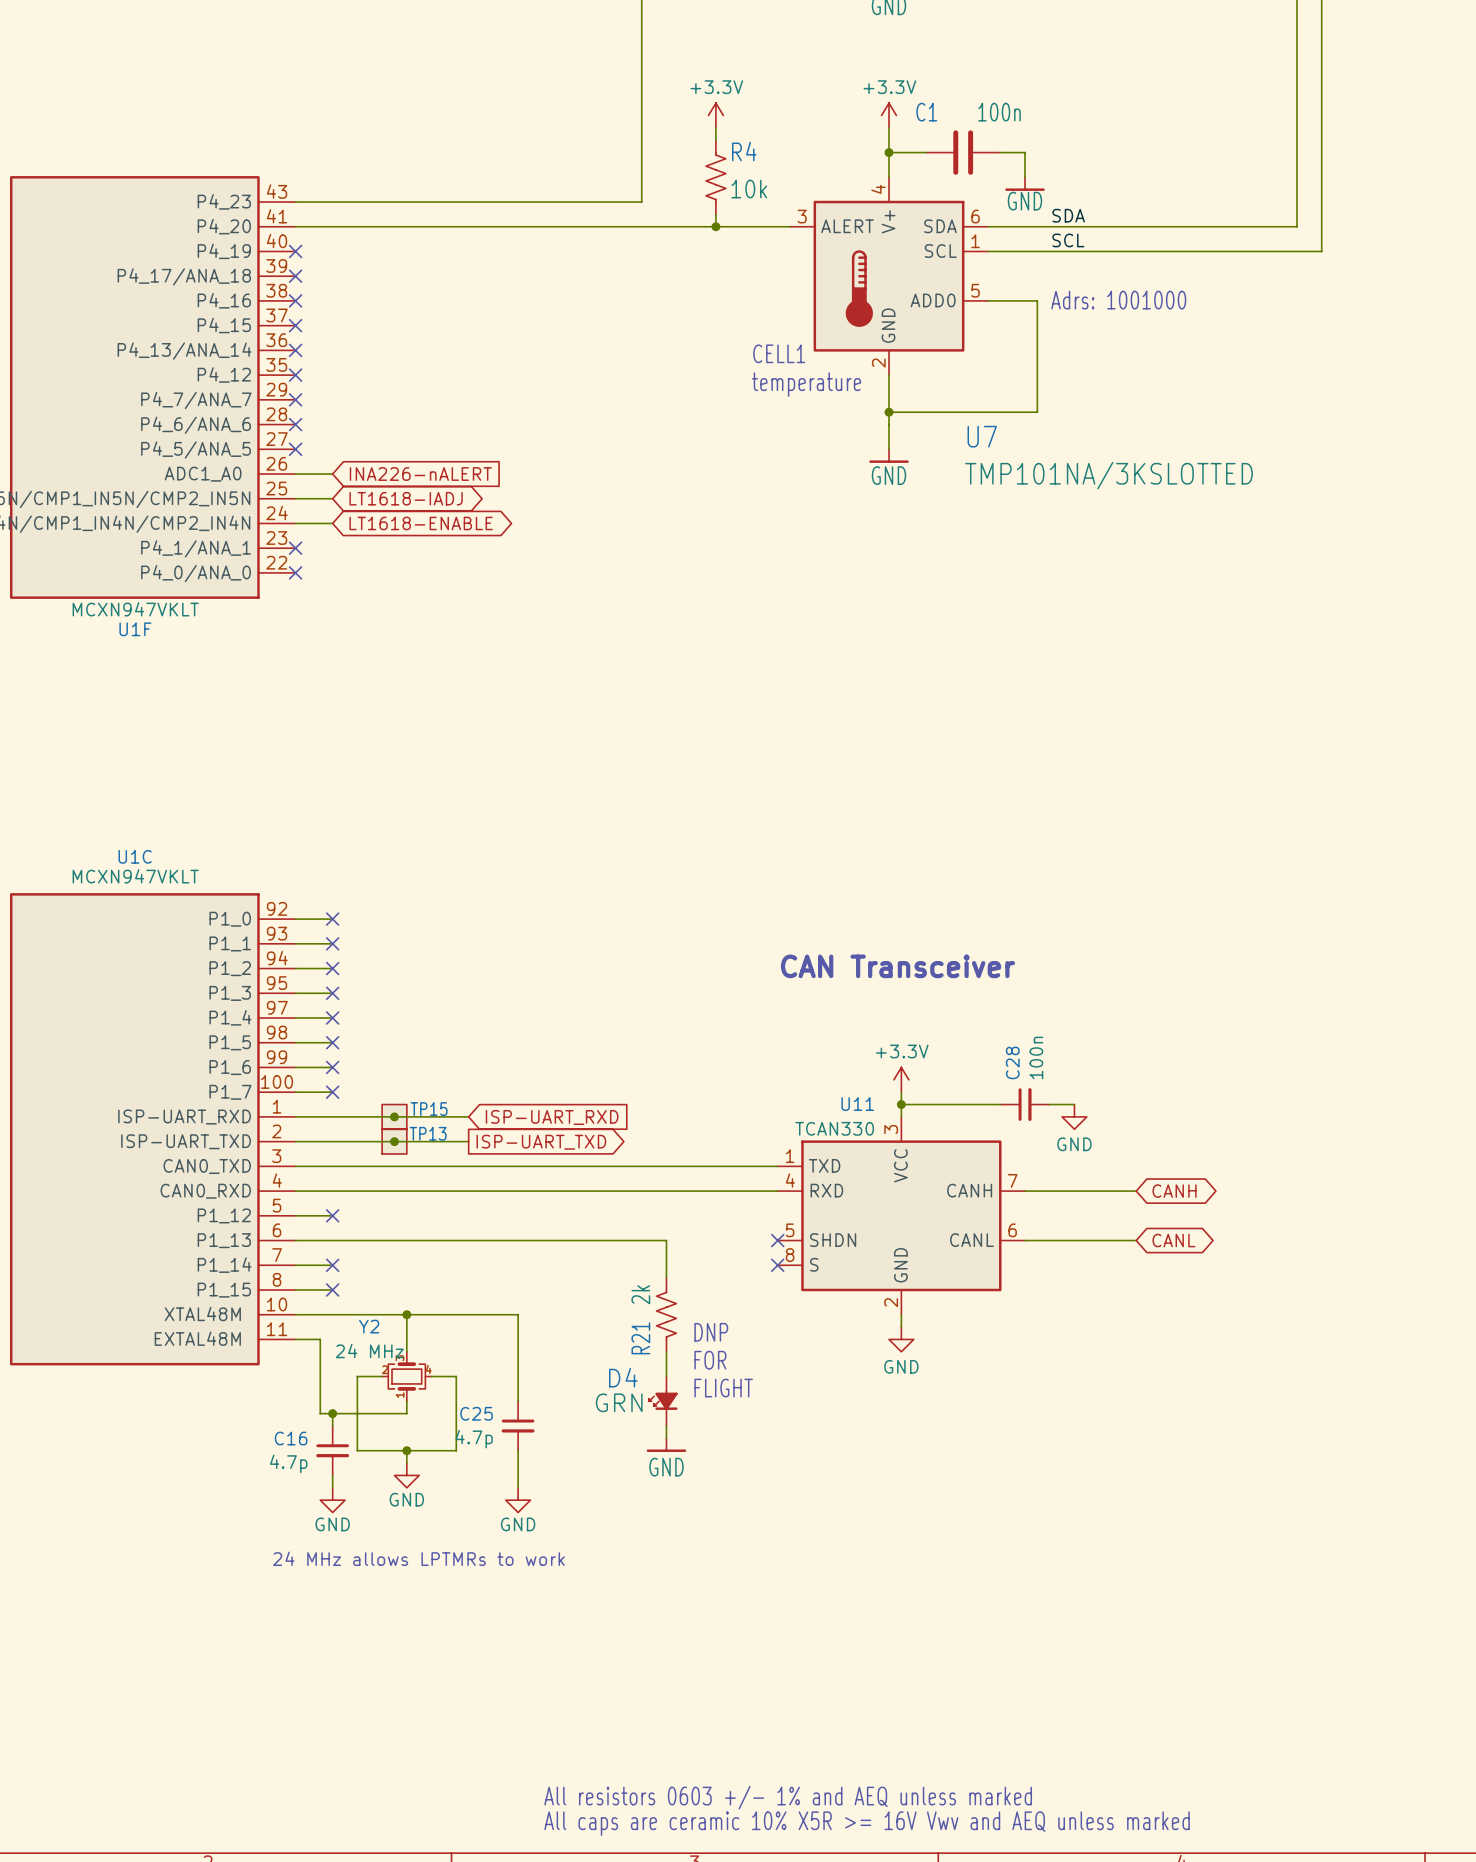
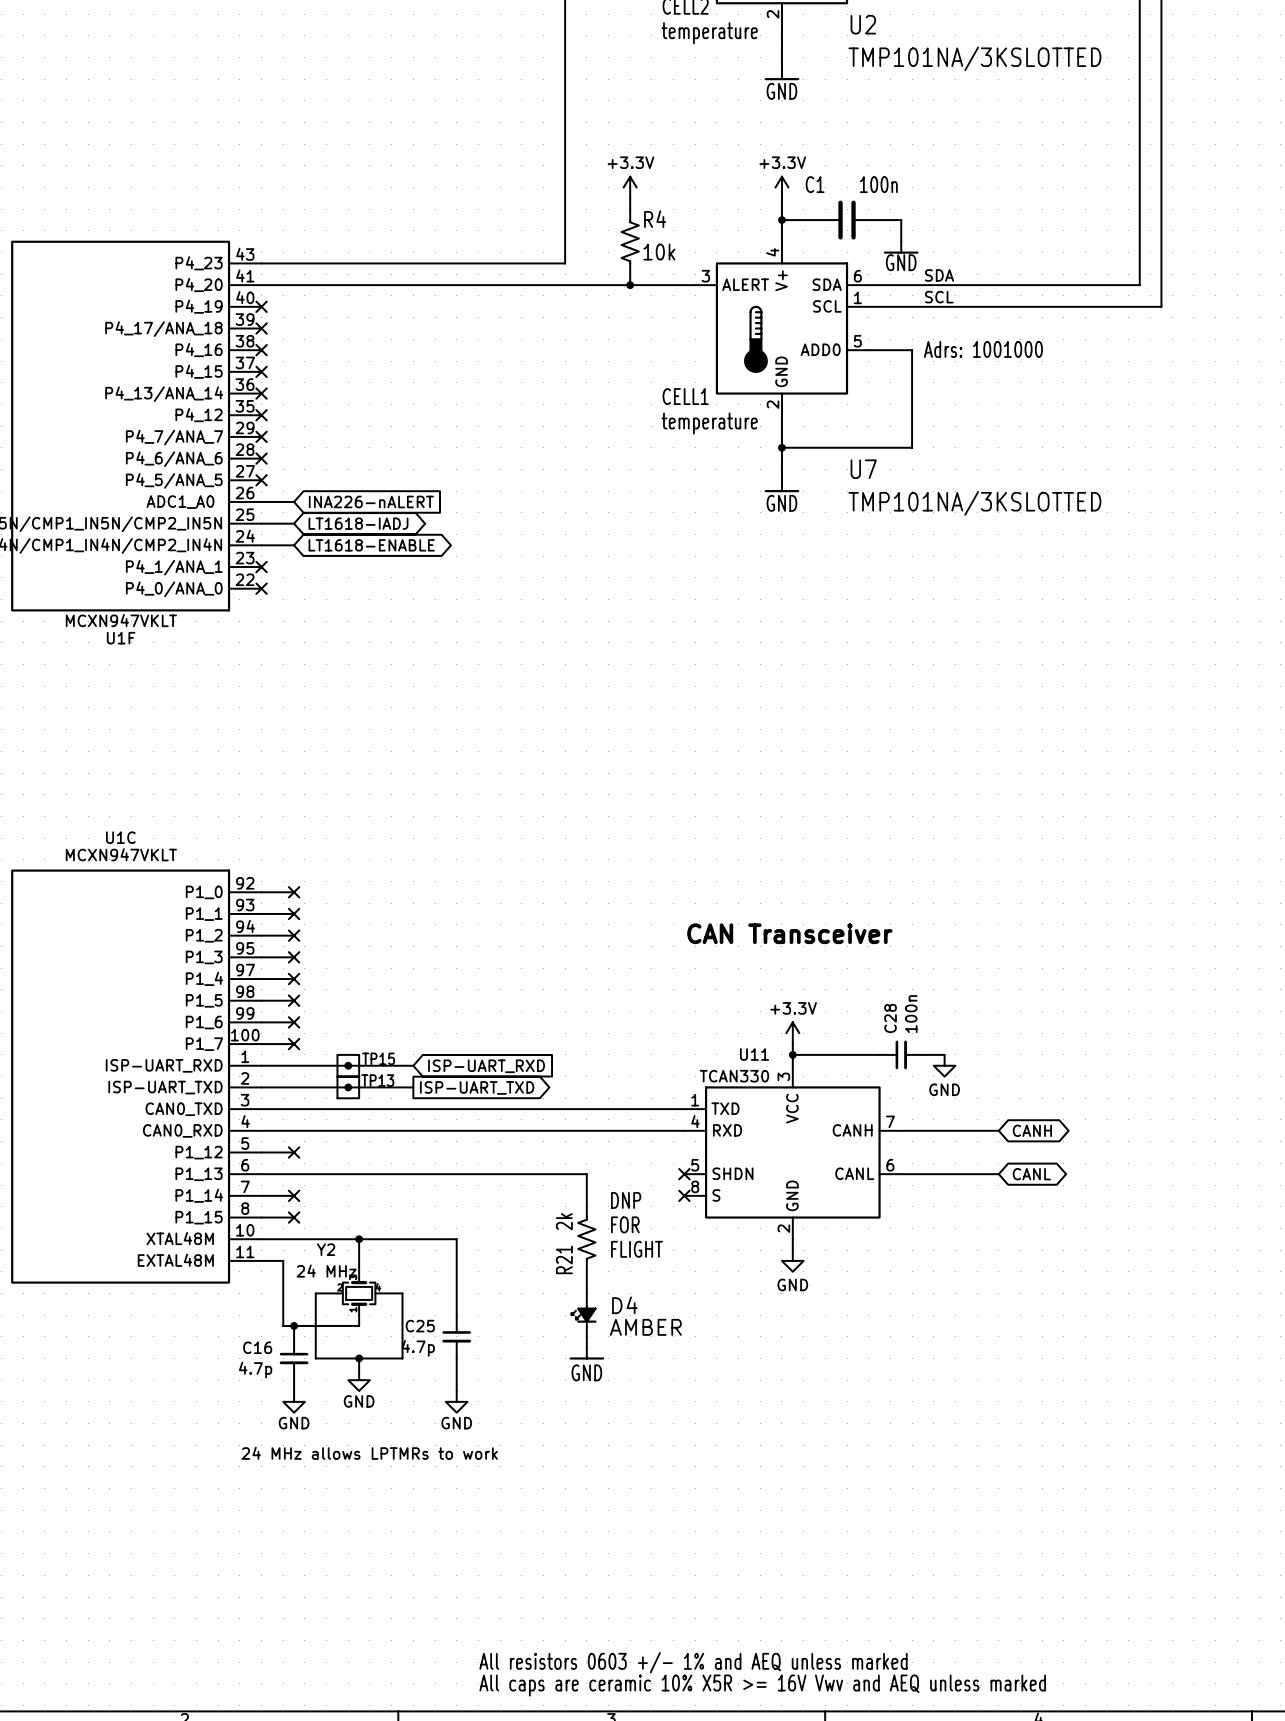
text position: DNP (711, 1332) -> DNP (626, 1200)
text position: FOR (710, 1360) -> FOR (625, 1224)
D4 name position: D4 (623, 1377) -> D4 (624, 1305)
text position: FLIGHT (723, 1388) -> FLIGHT (636, 1249)
D4 value: GRN (619, 1402) -> AMBER (645, 1327)

